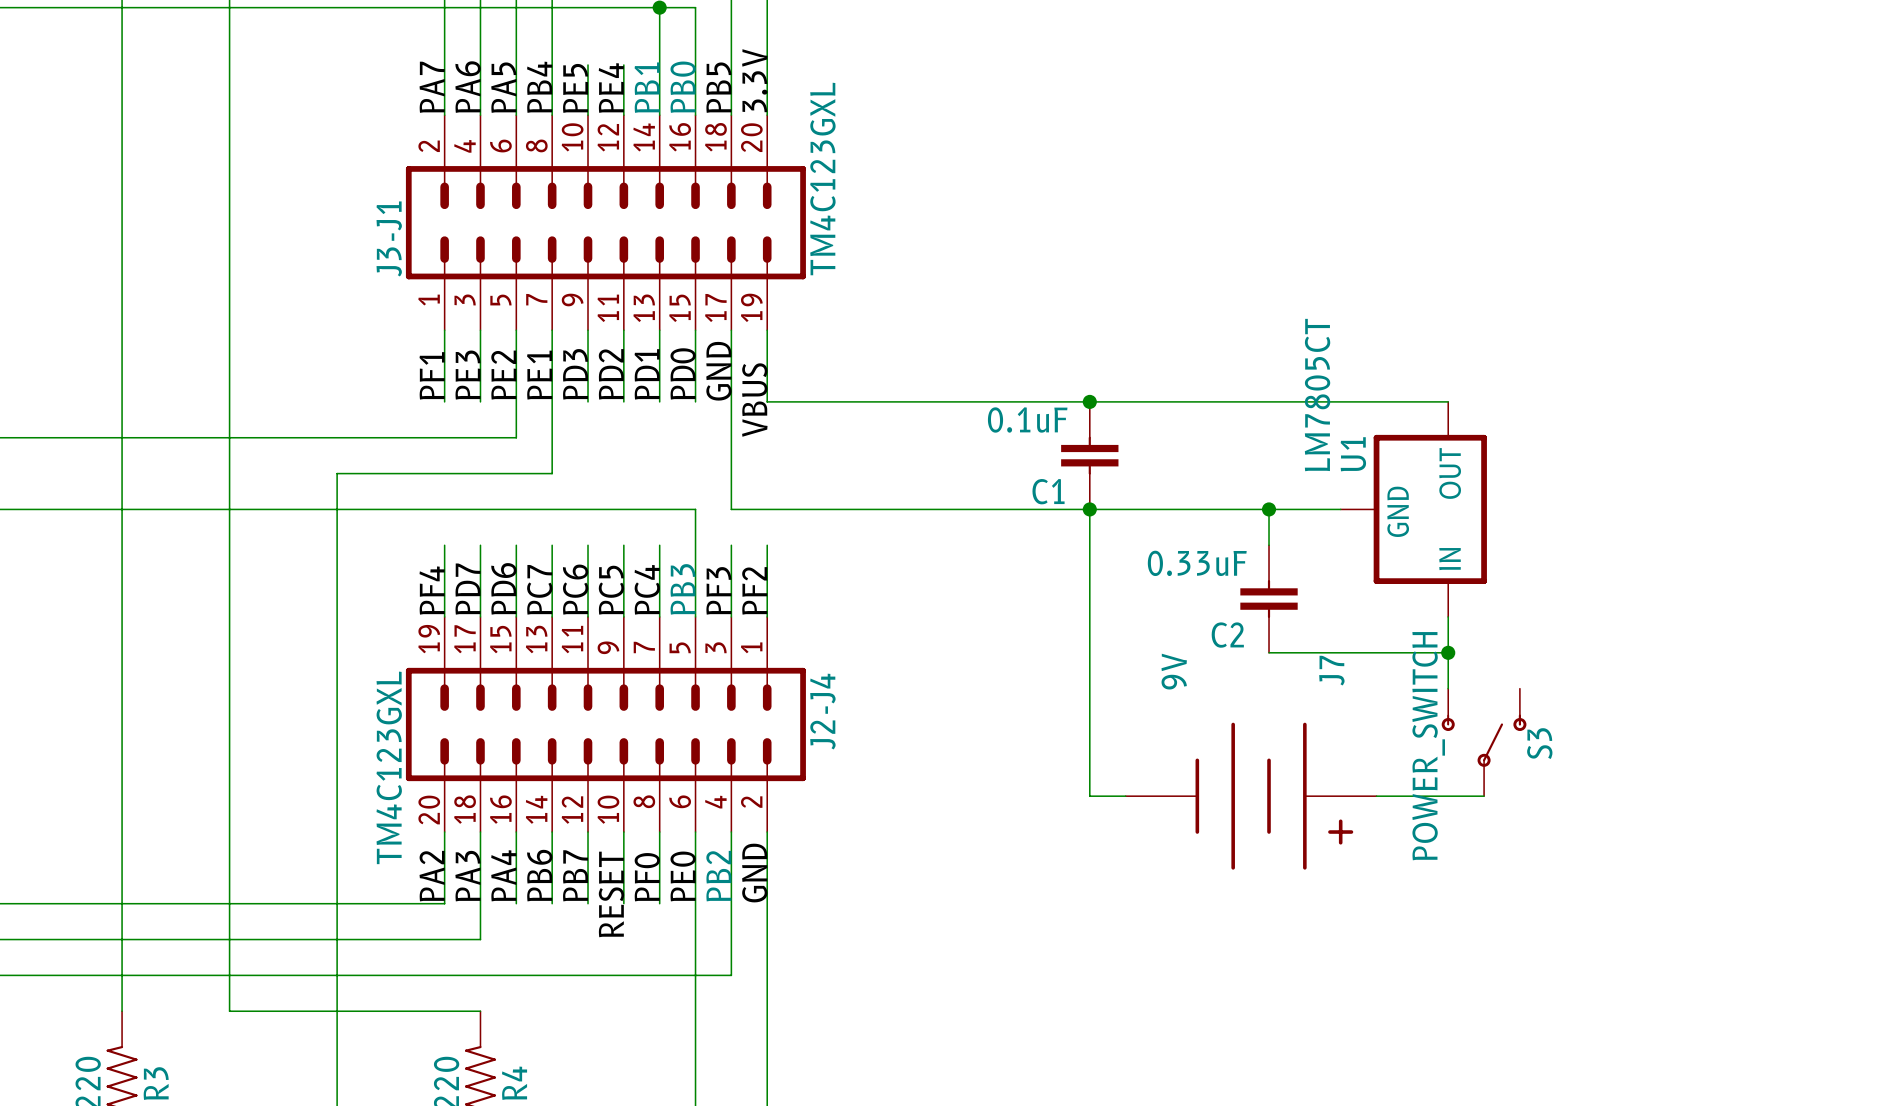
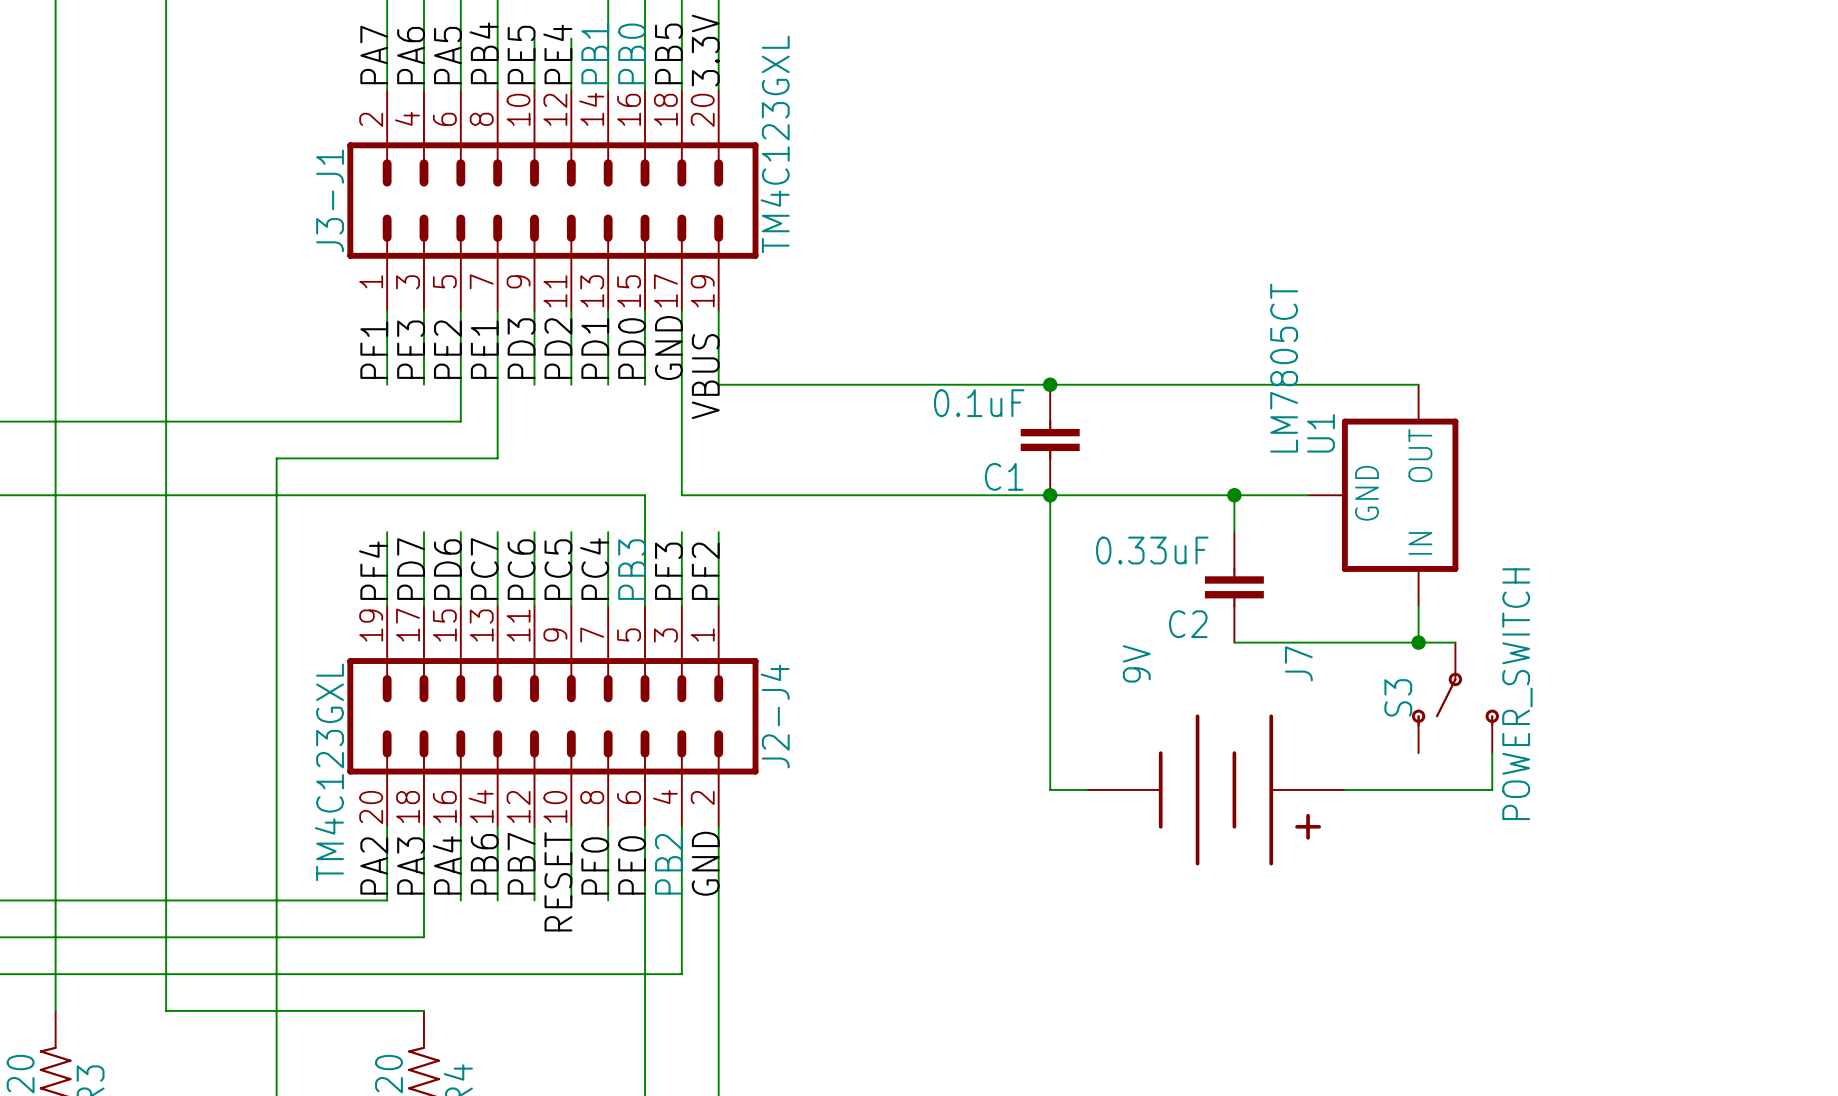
wire: (1448, 652) (1448, 688) -> (1418, 642) (1455, 642)
S3 rotation: 0° (1484, 740) -> 180° (1455, 699)
wire: none -> (1492, 753) (1492, 789) (1455, 789)

